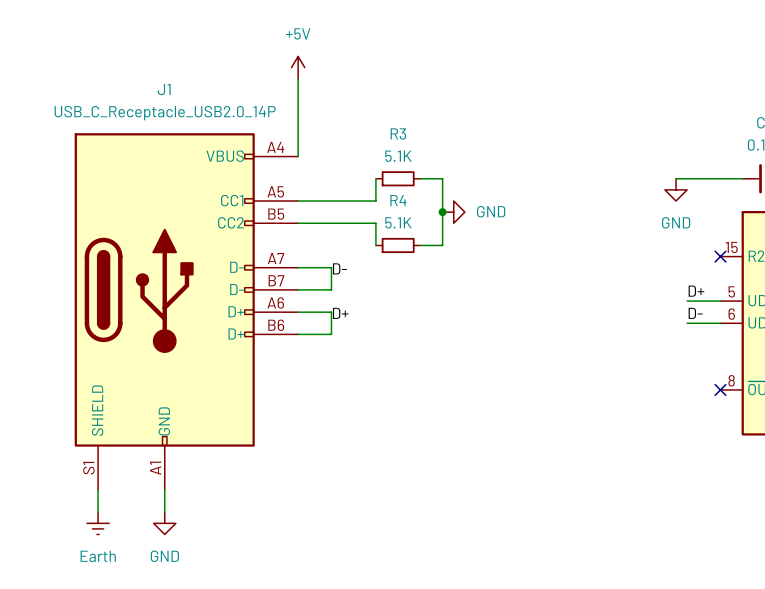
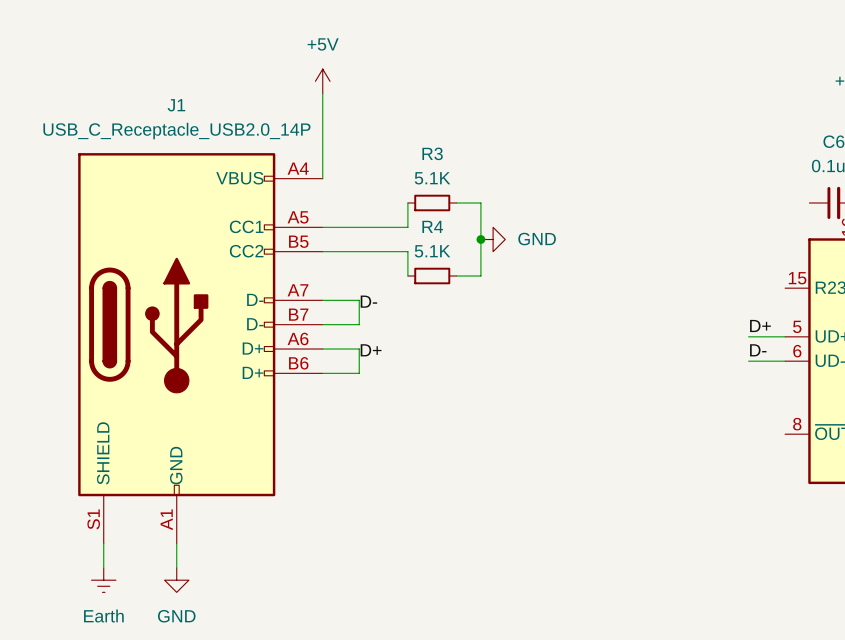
wire: (676, 178) (742, 178) -> none
power symbol: GND (676, 189) -> none
no-connect mark: (720, 256) -> none
no-connect mark: (720, 389) -> none

